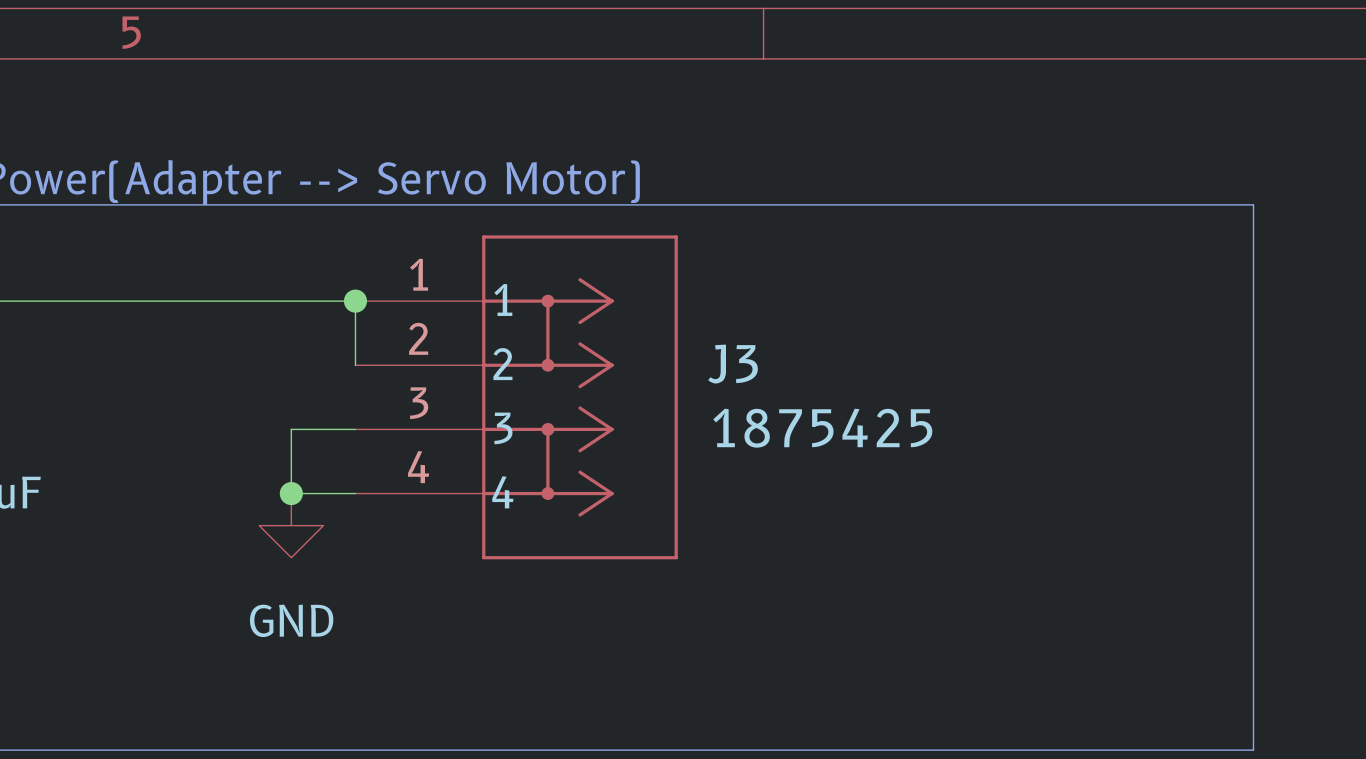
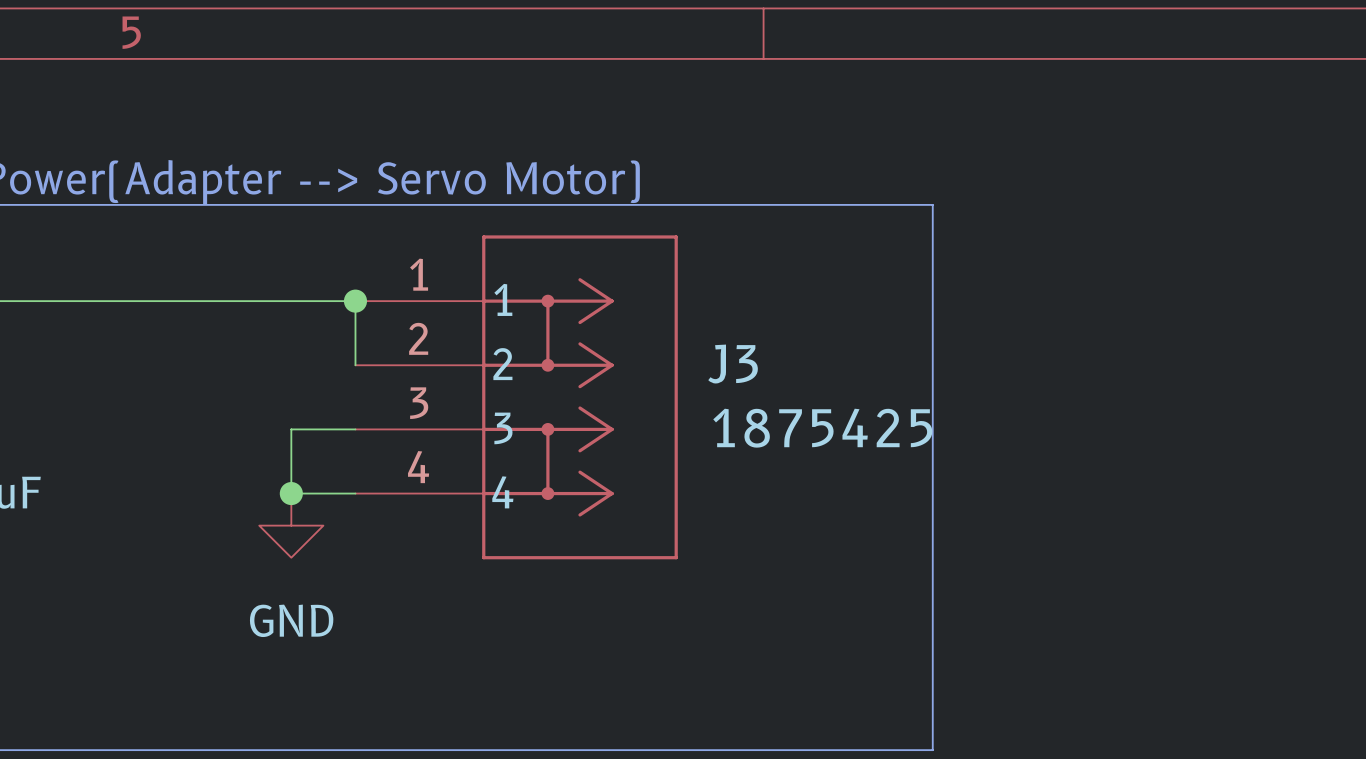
line: (932, 204) (1253, 204) (1253, 750) (932, 750) -> (932, 204) (932, 750)

